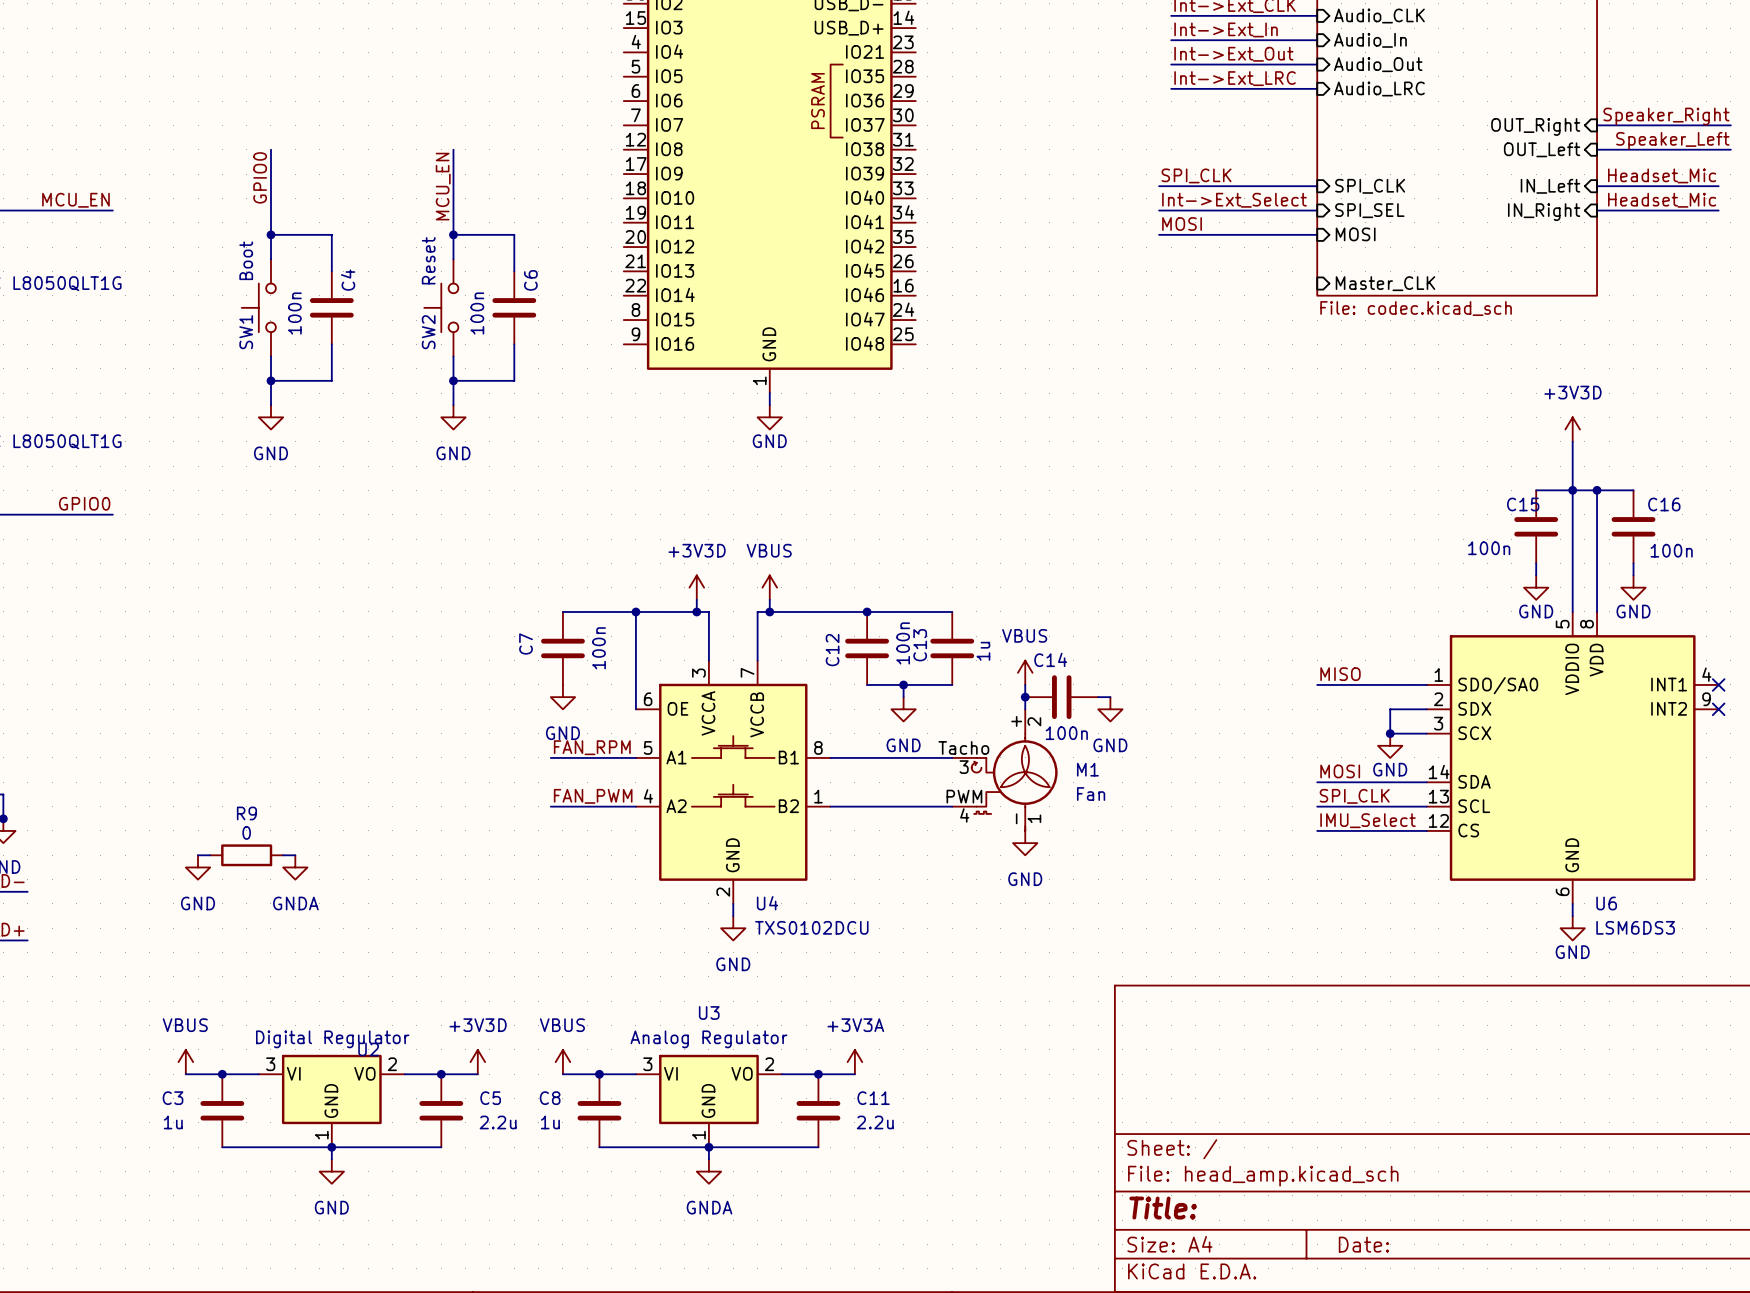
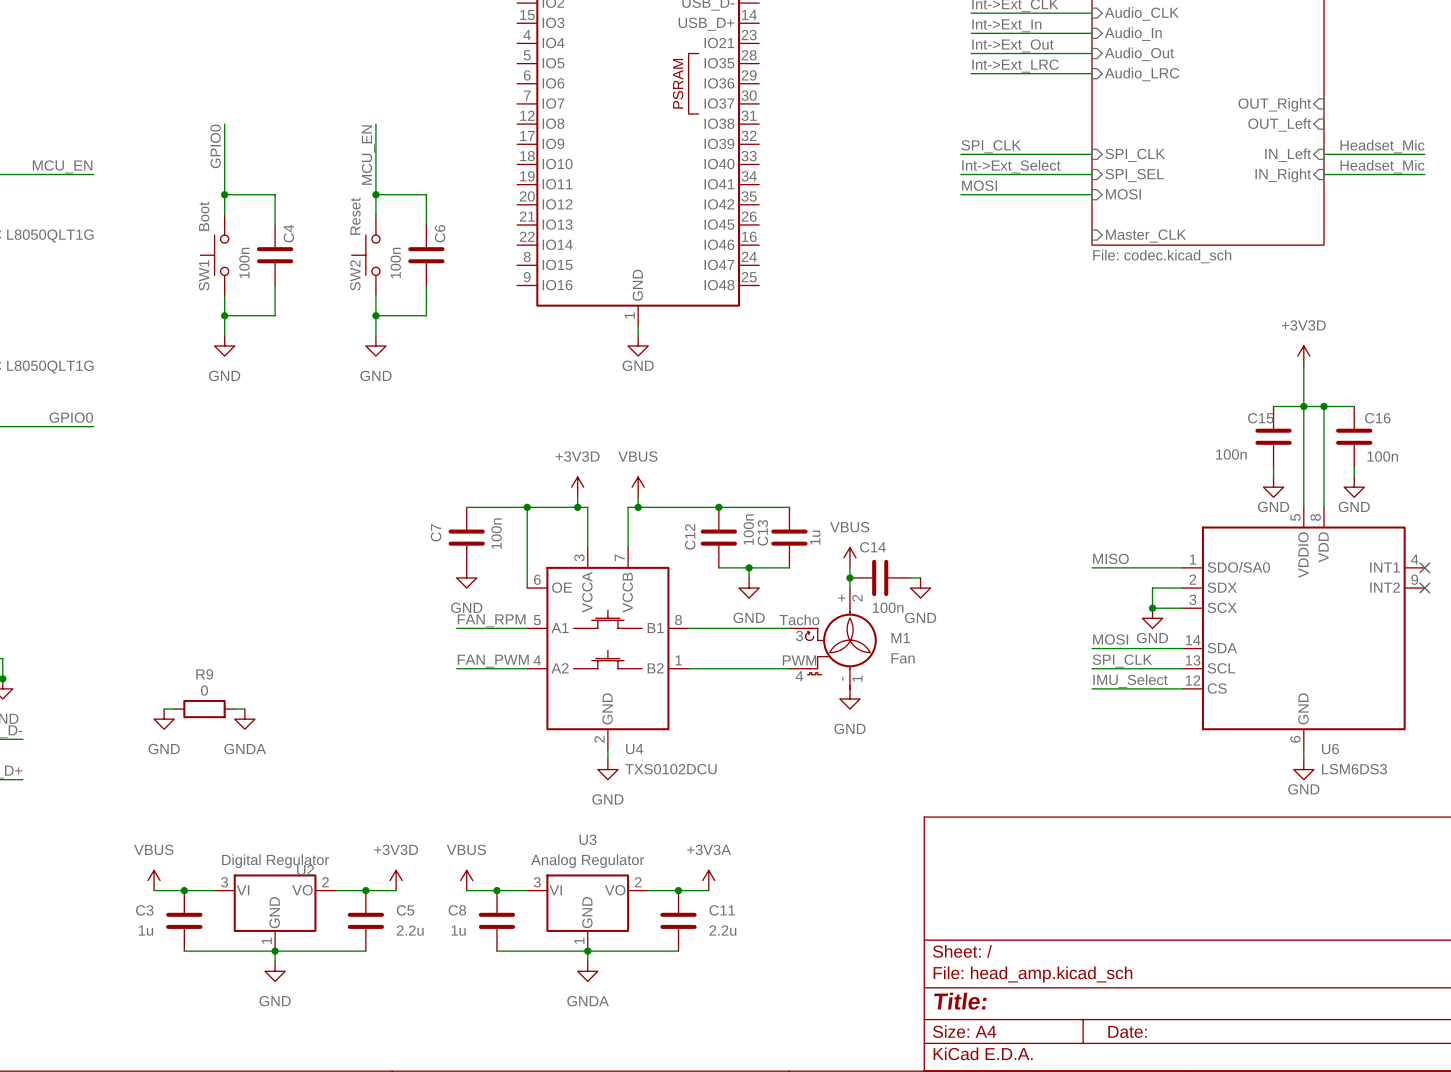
label: Speaker_Right (1666, 116) -> none
wire: (1597, 125) (1730, 125) -> none
label: Speaker_Left (1672, 140) -> none
wire: (1597, 149) (1730, 149) -> none

